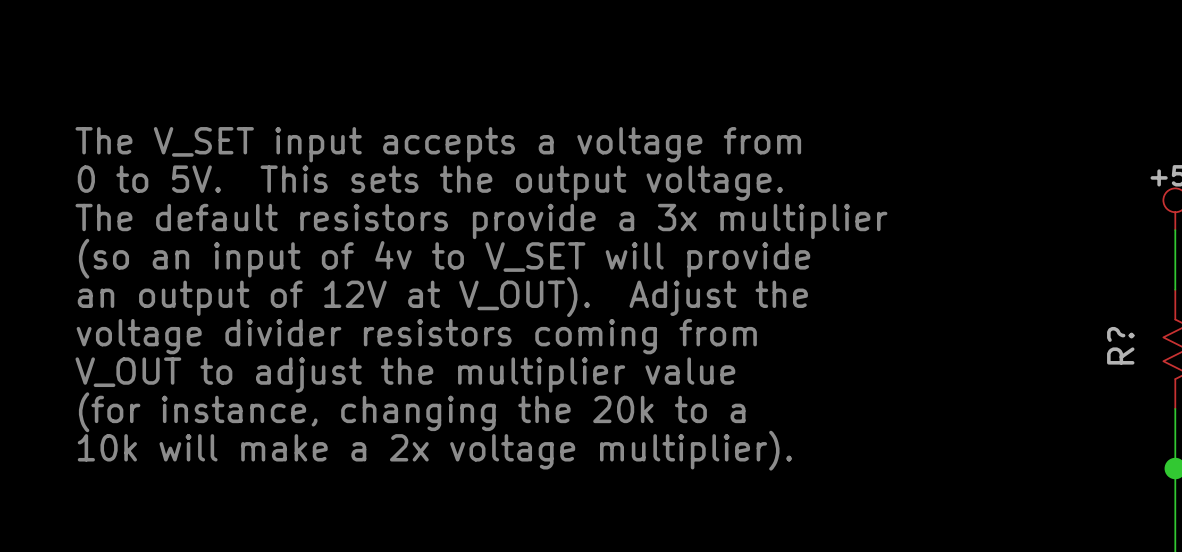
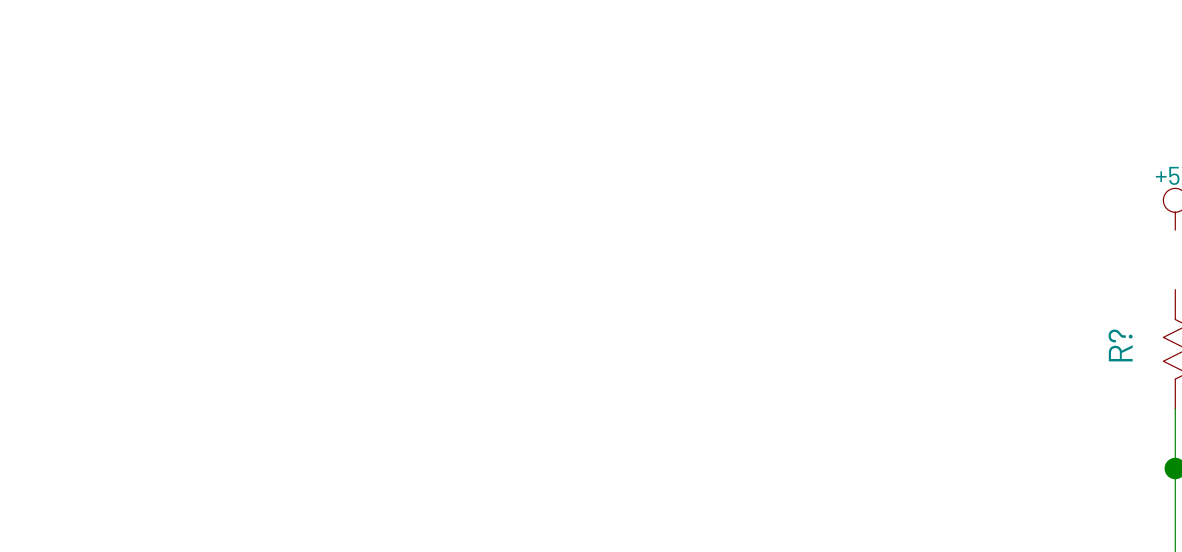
text: The V_SET input accepts a voltage from (438, 144) -> none
text: 0 to 5V. This sets the output voltage. (430, 183) -> none
text: The default resistors provide a 3x multiplier (481, 221) -> none
wire: (1175, 230) (1175, 289) -> none
text: (so an input of 4v to V_SET will provide (444, 258) -> none
text: an output of 12V at V_OUT). Adjust the (442, 297) -> none
text: voltage divider resistors coming from (416, 336) -> none
text: V_OUT to adjust the multiplier value (405, 375) -> none
text: (for instance, changing the 20k to a (412, 412) -> none
text: 10k will make a 2x voltage multiplier). (434, 450) -> none

